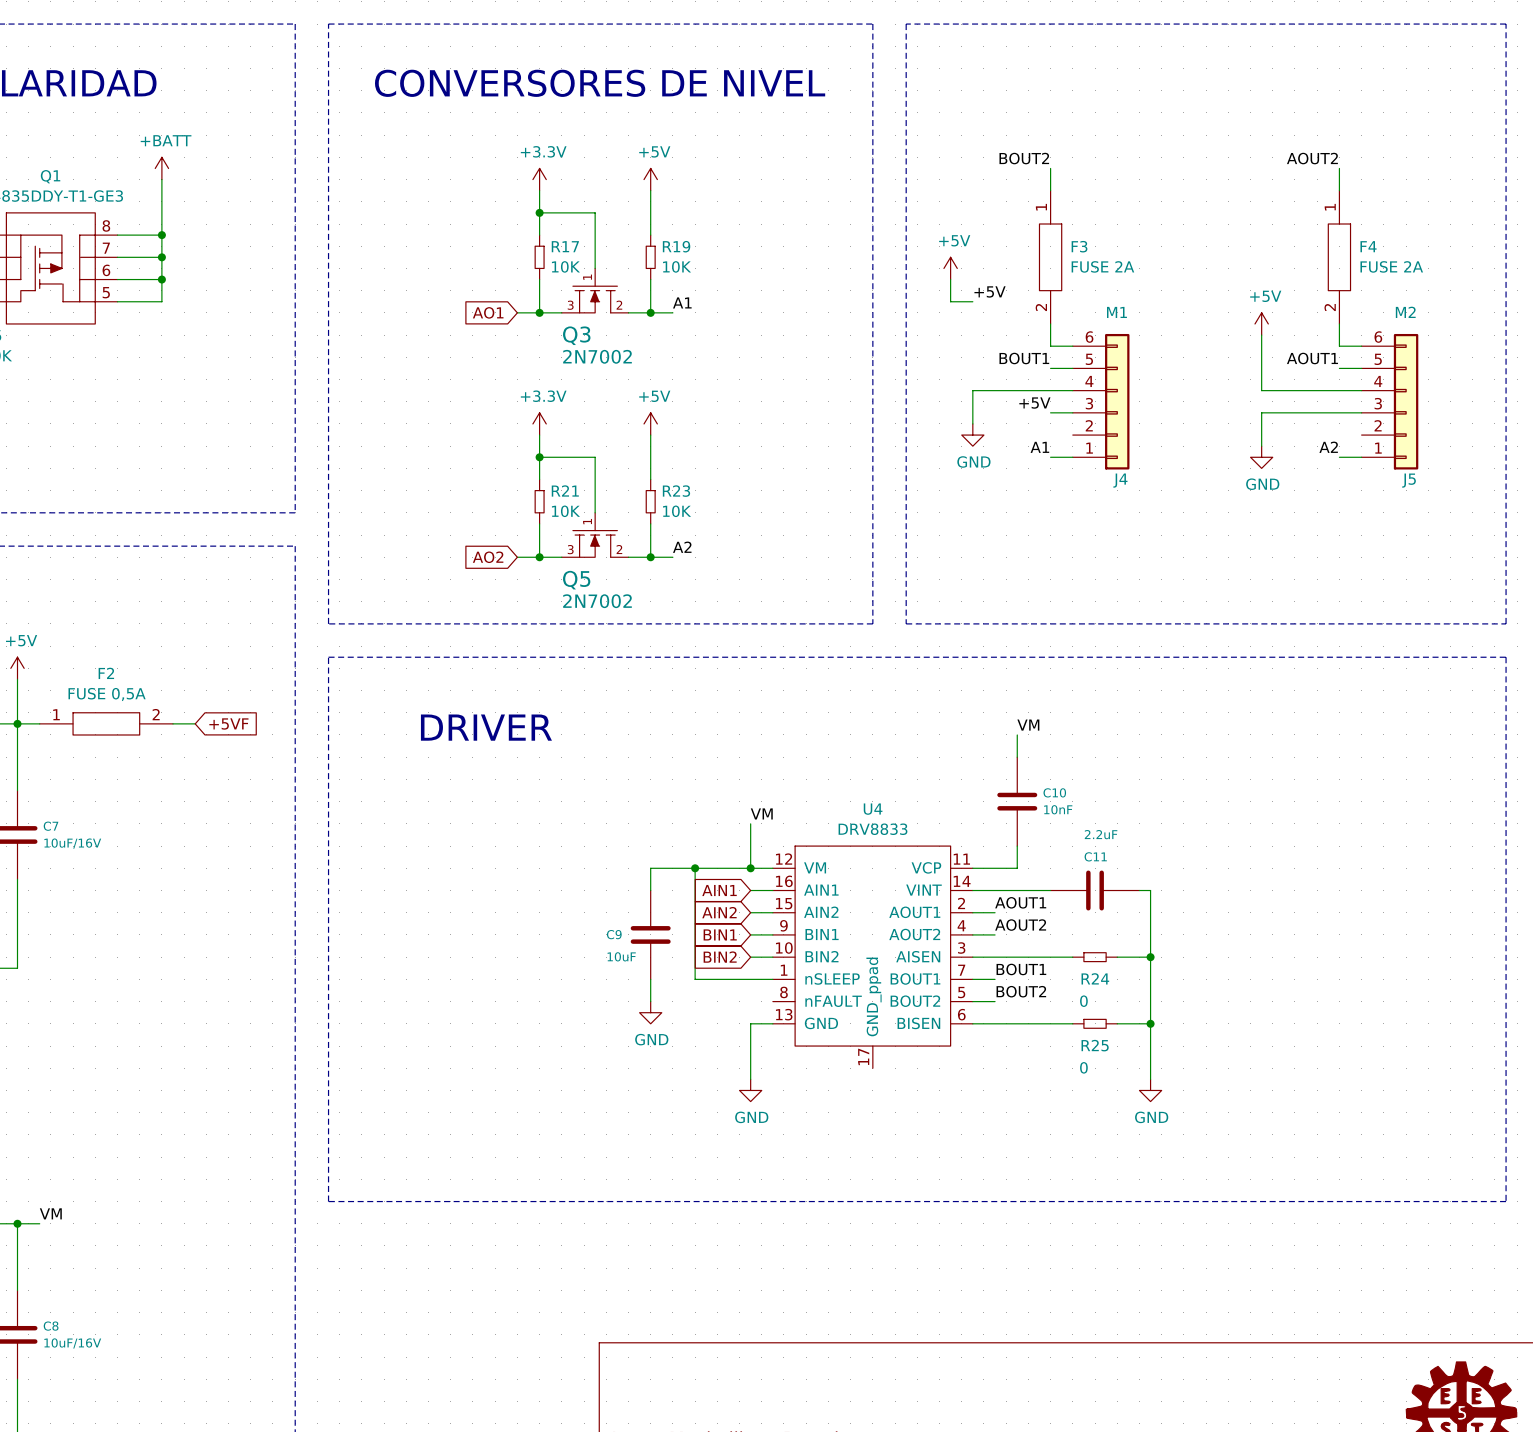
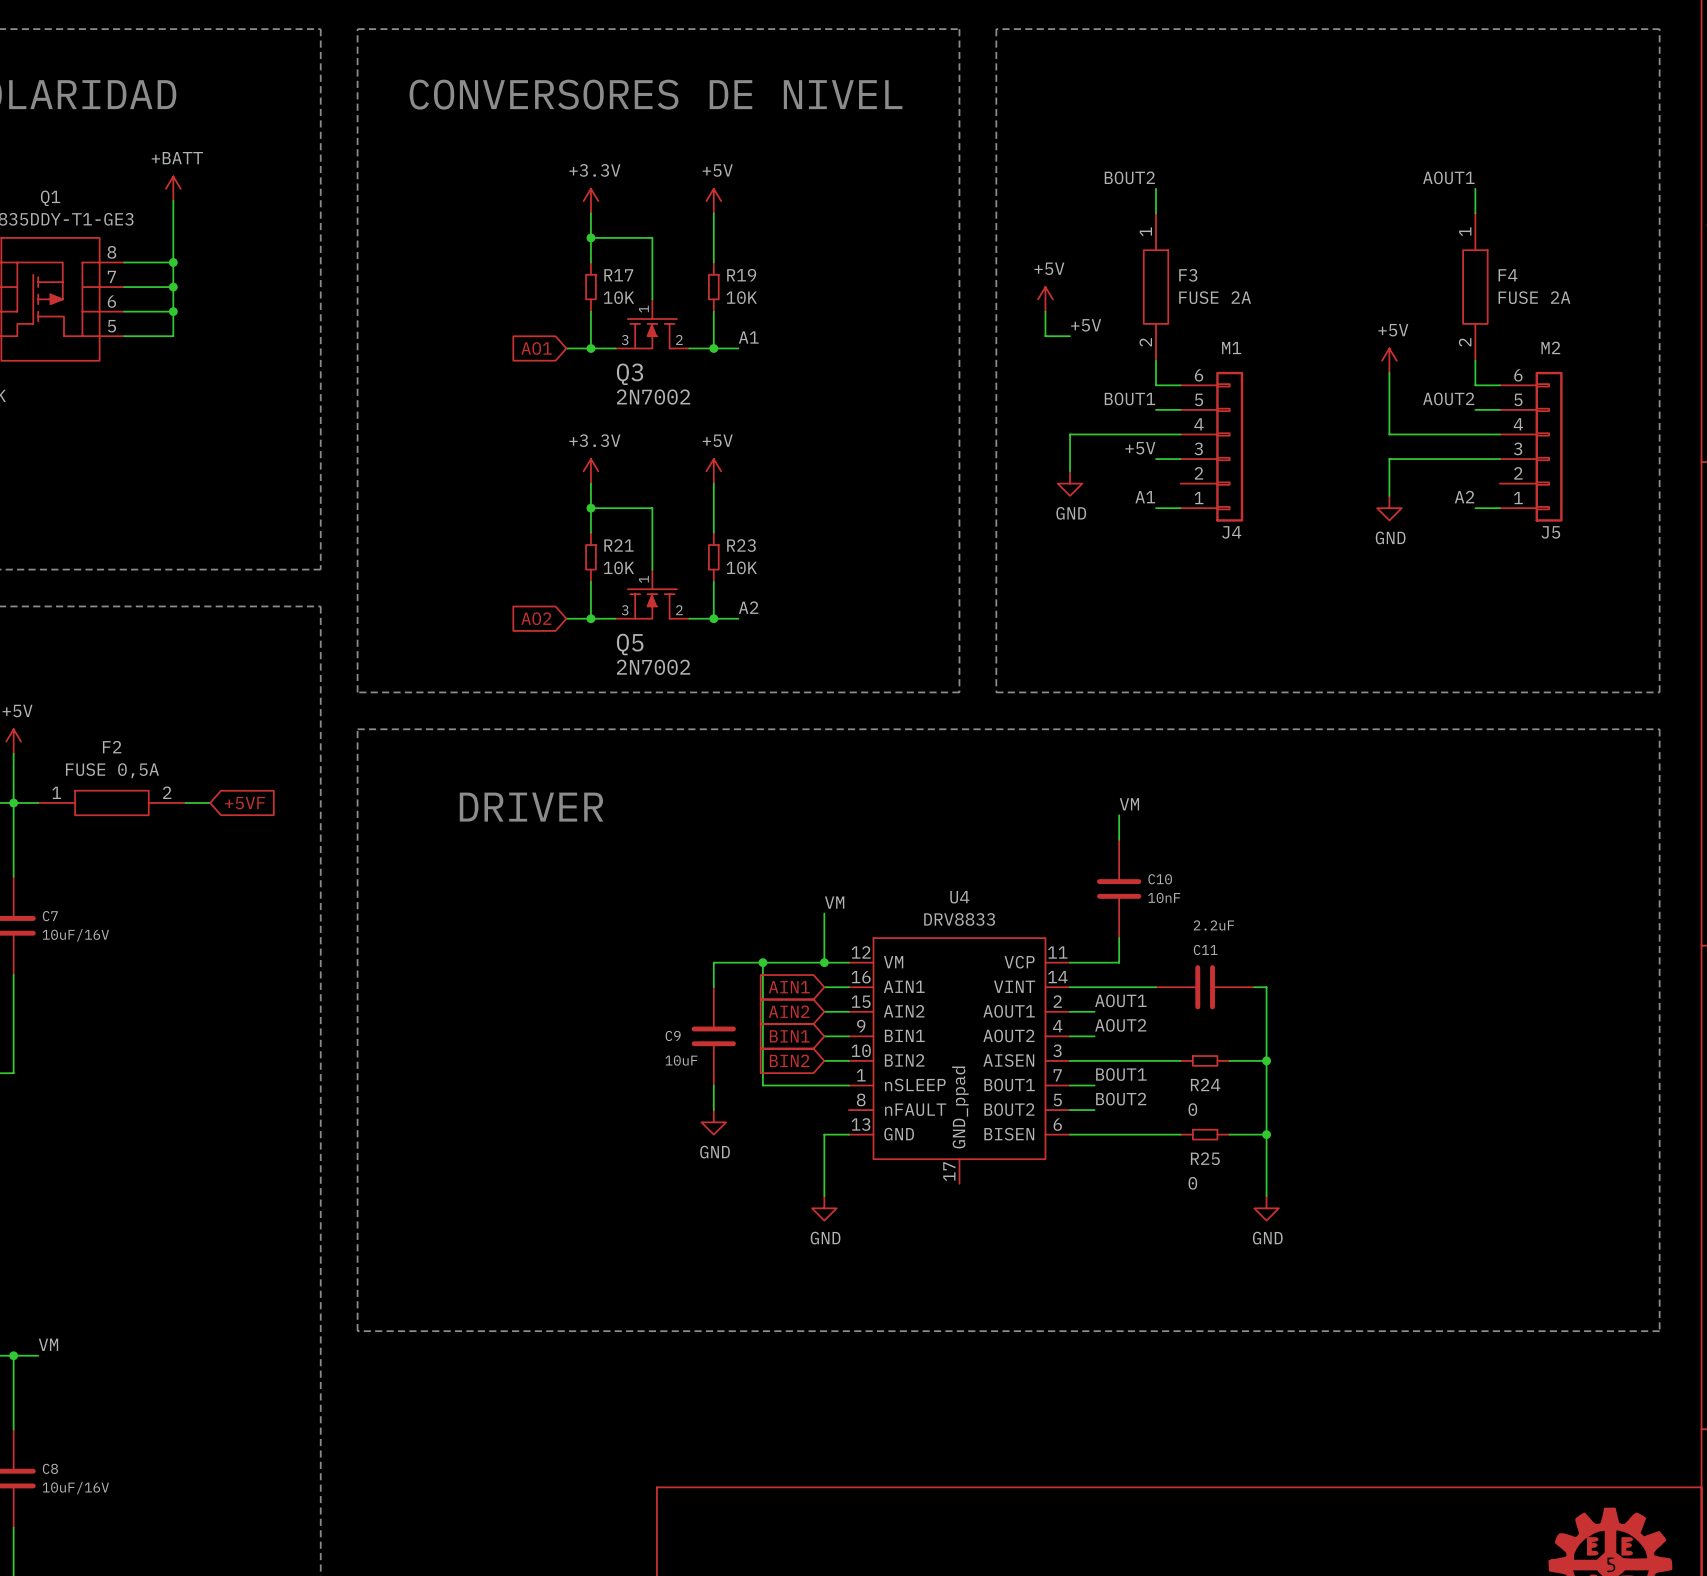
label: AOUT2 (1312, 158) -> AOUT1 (1448, 177)
label: AOUT1 (1312, 358) -> AOUT2 (1448, 398)

